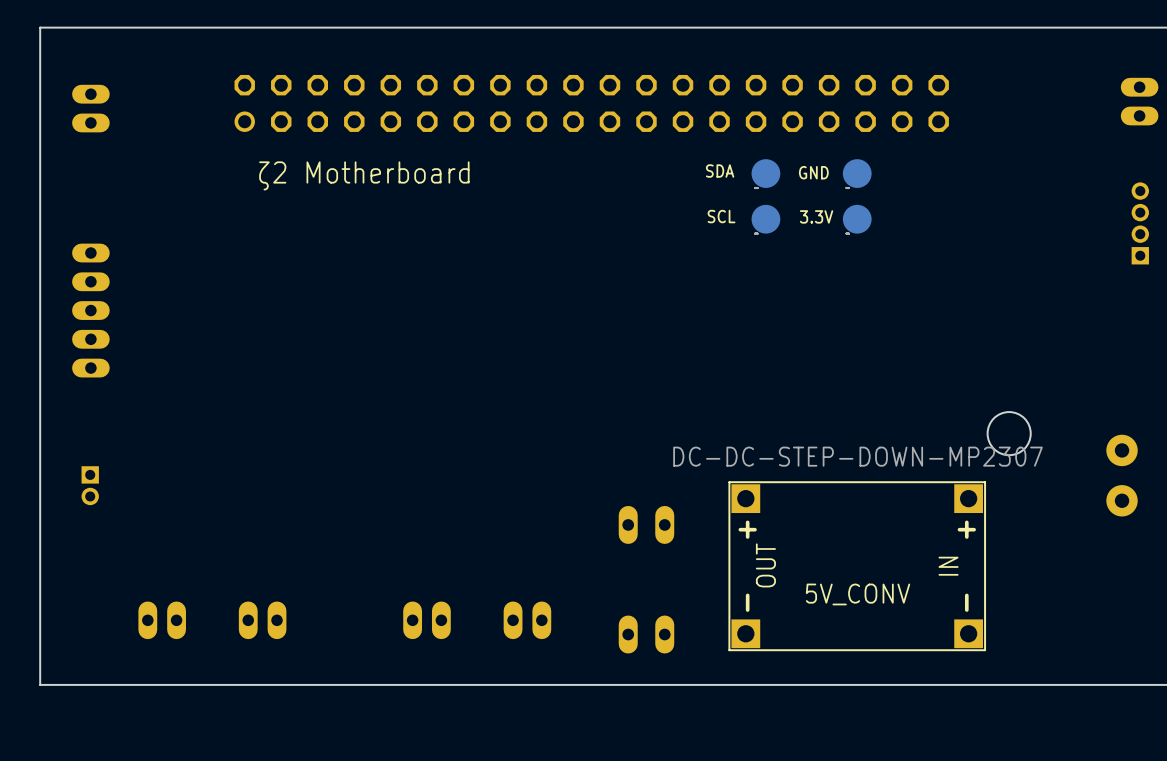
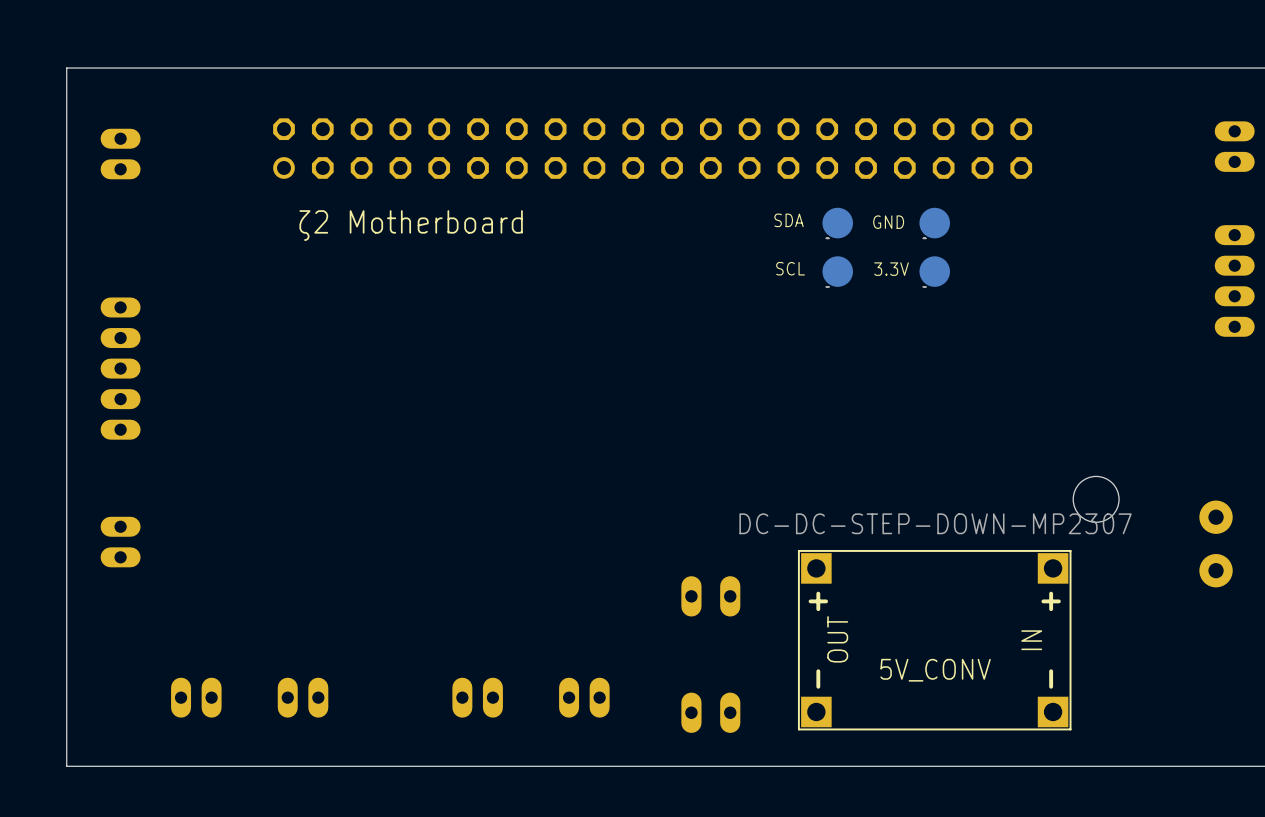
part footprint: [1131, 182, 1149, 265] -> [1214, 225, 1255, 337]
part footprint: [81, 466, 99, 506] -> [100, 516, 141, 568]

